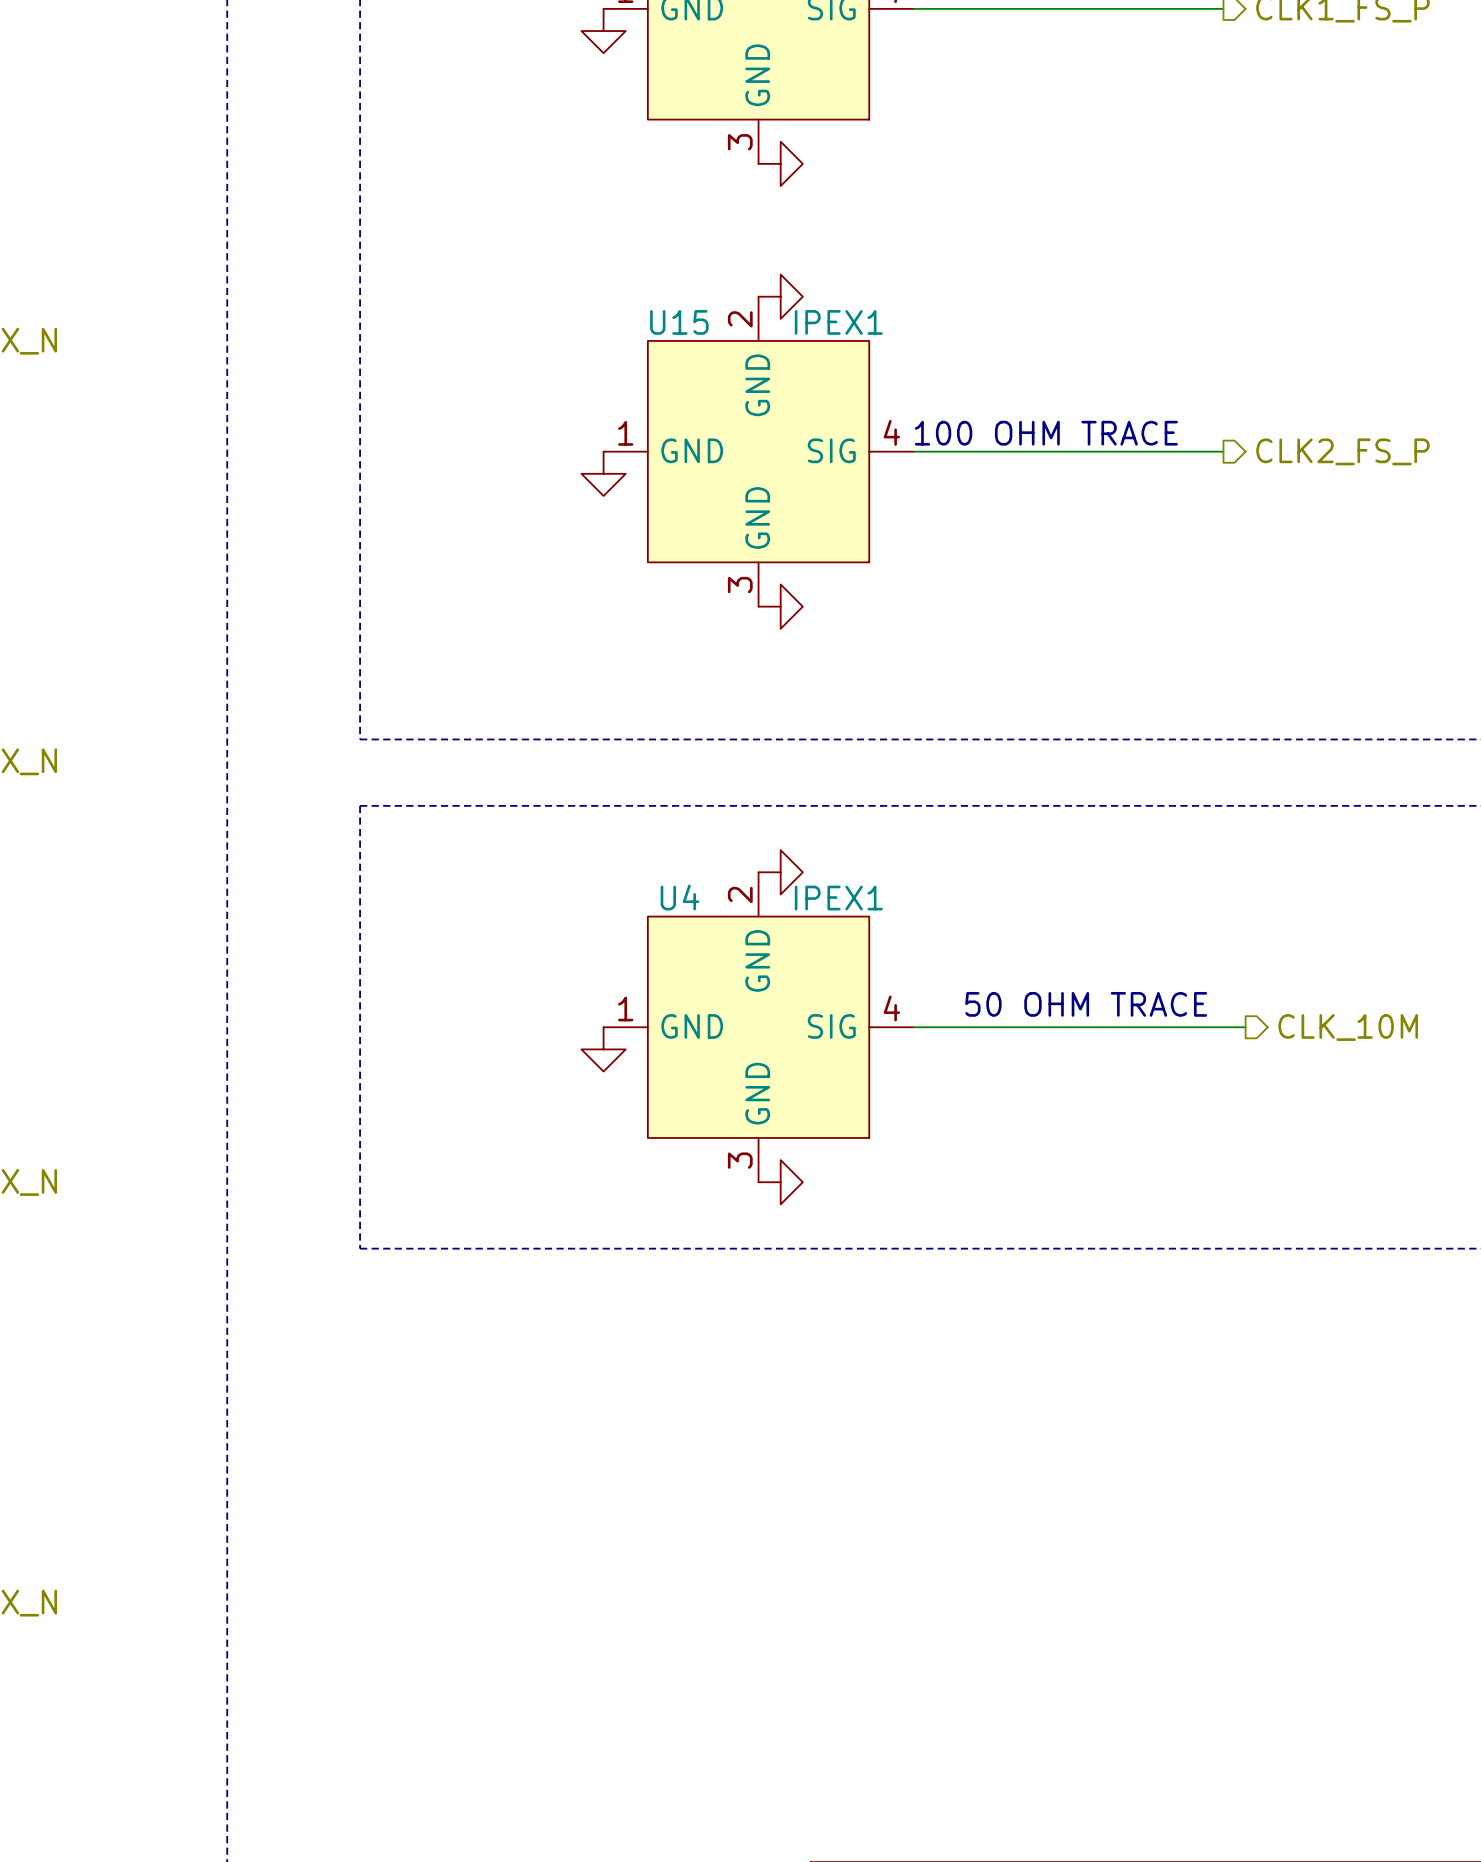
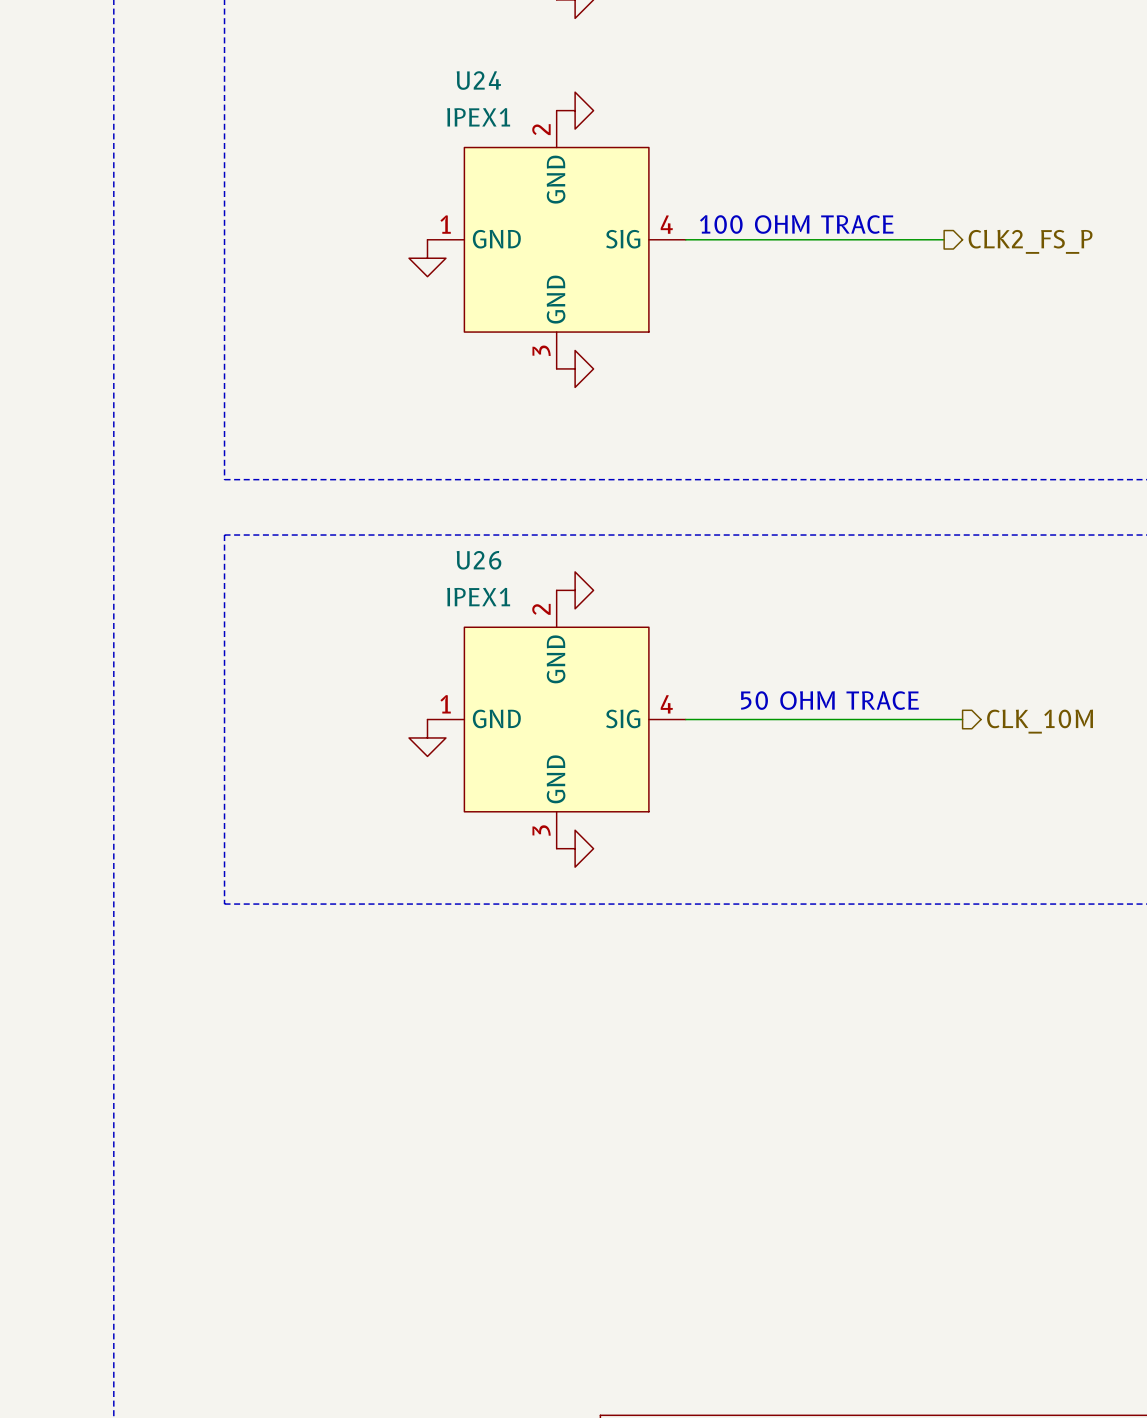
U15 name: U15 (679, 322) -> U24 (478, 80)
U15 value position: IPEX1 (838, 322) -> IPEX1 (478, 117)
U4 name: U4 (679, 897) -> U26 (479, 560)
U4 value position: IPEX1 (838, 898) -> IPEX1 (478, 597)

